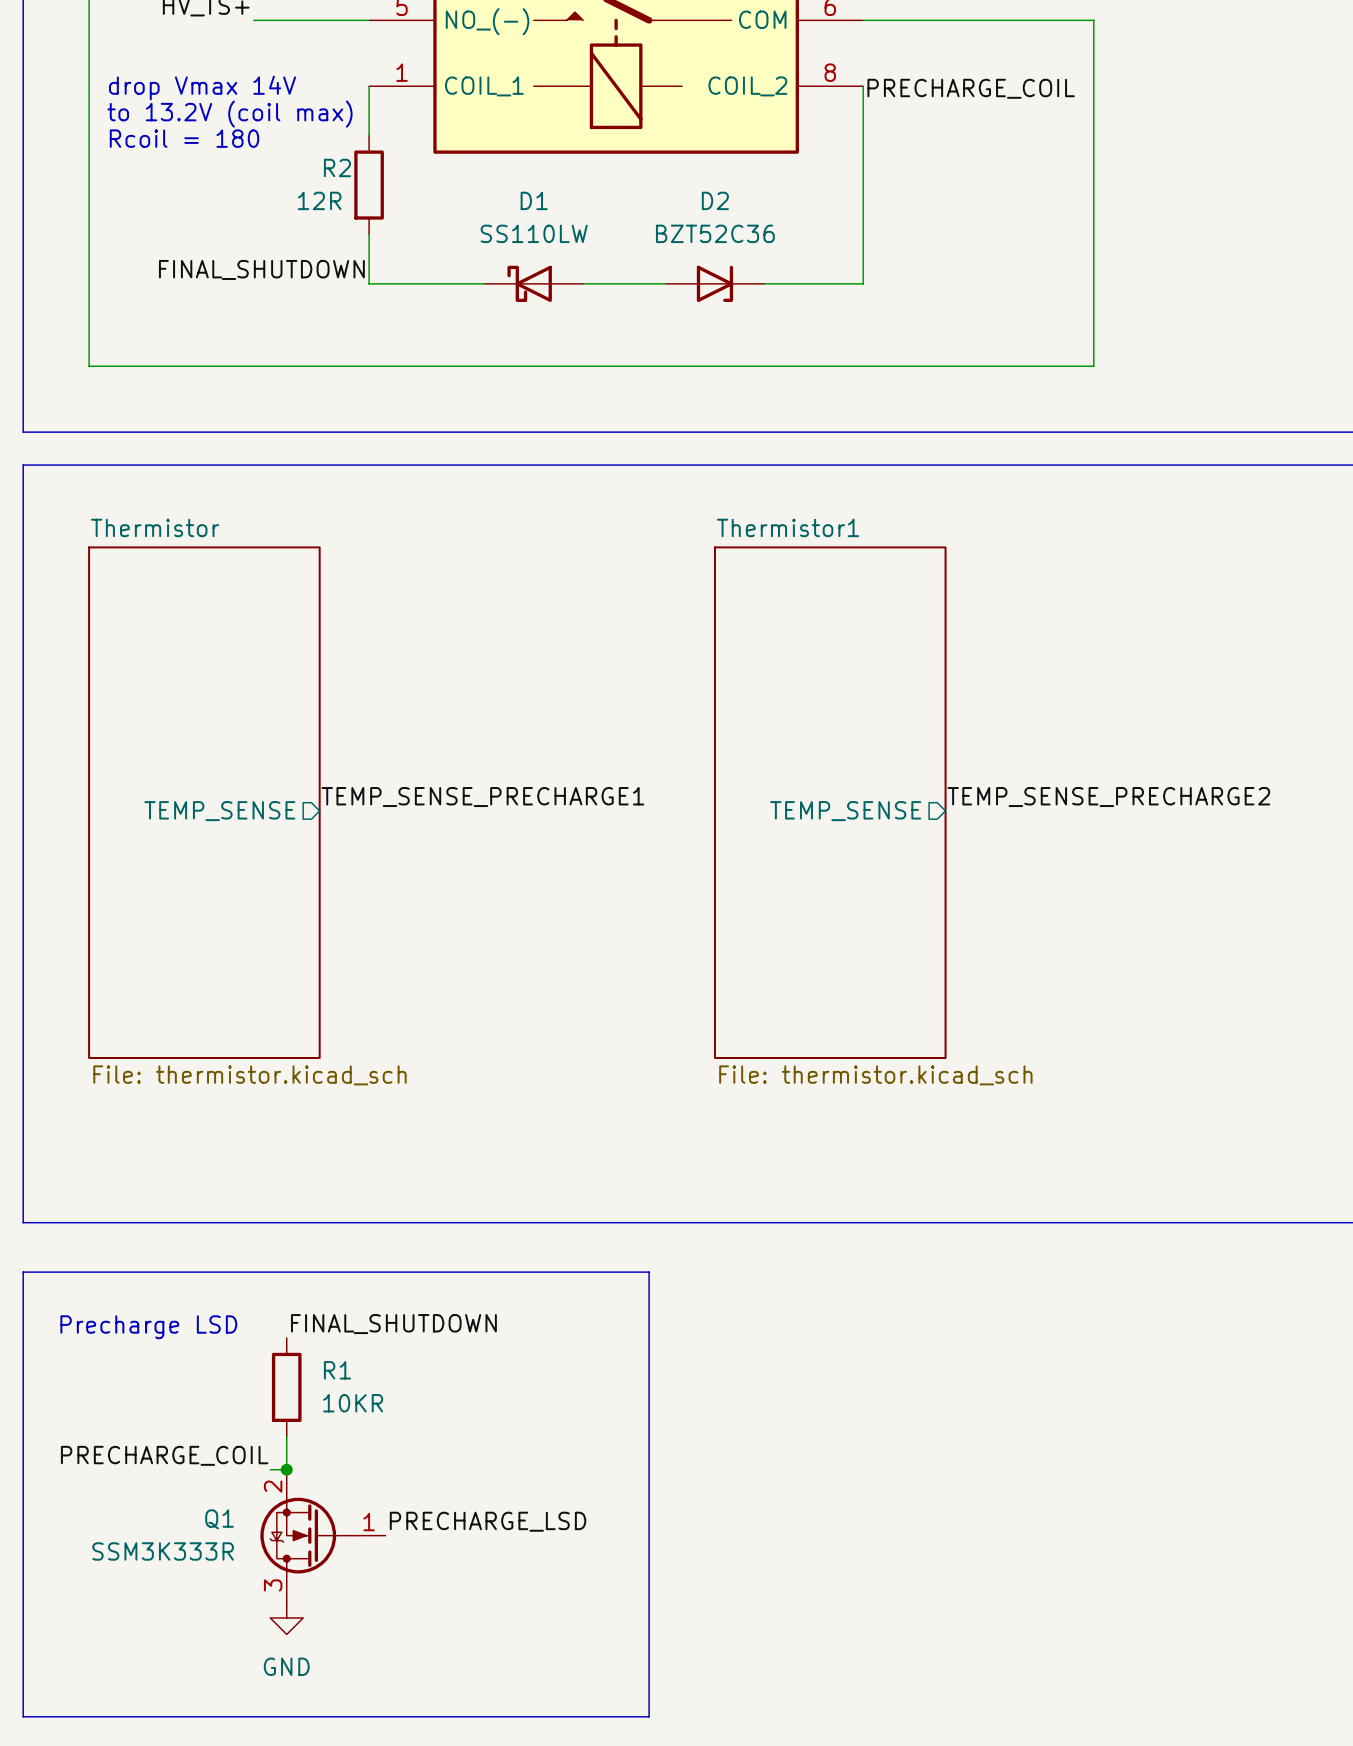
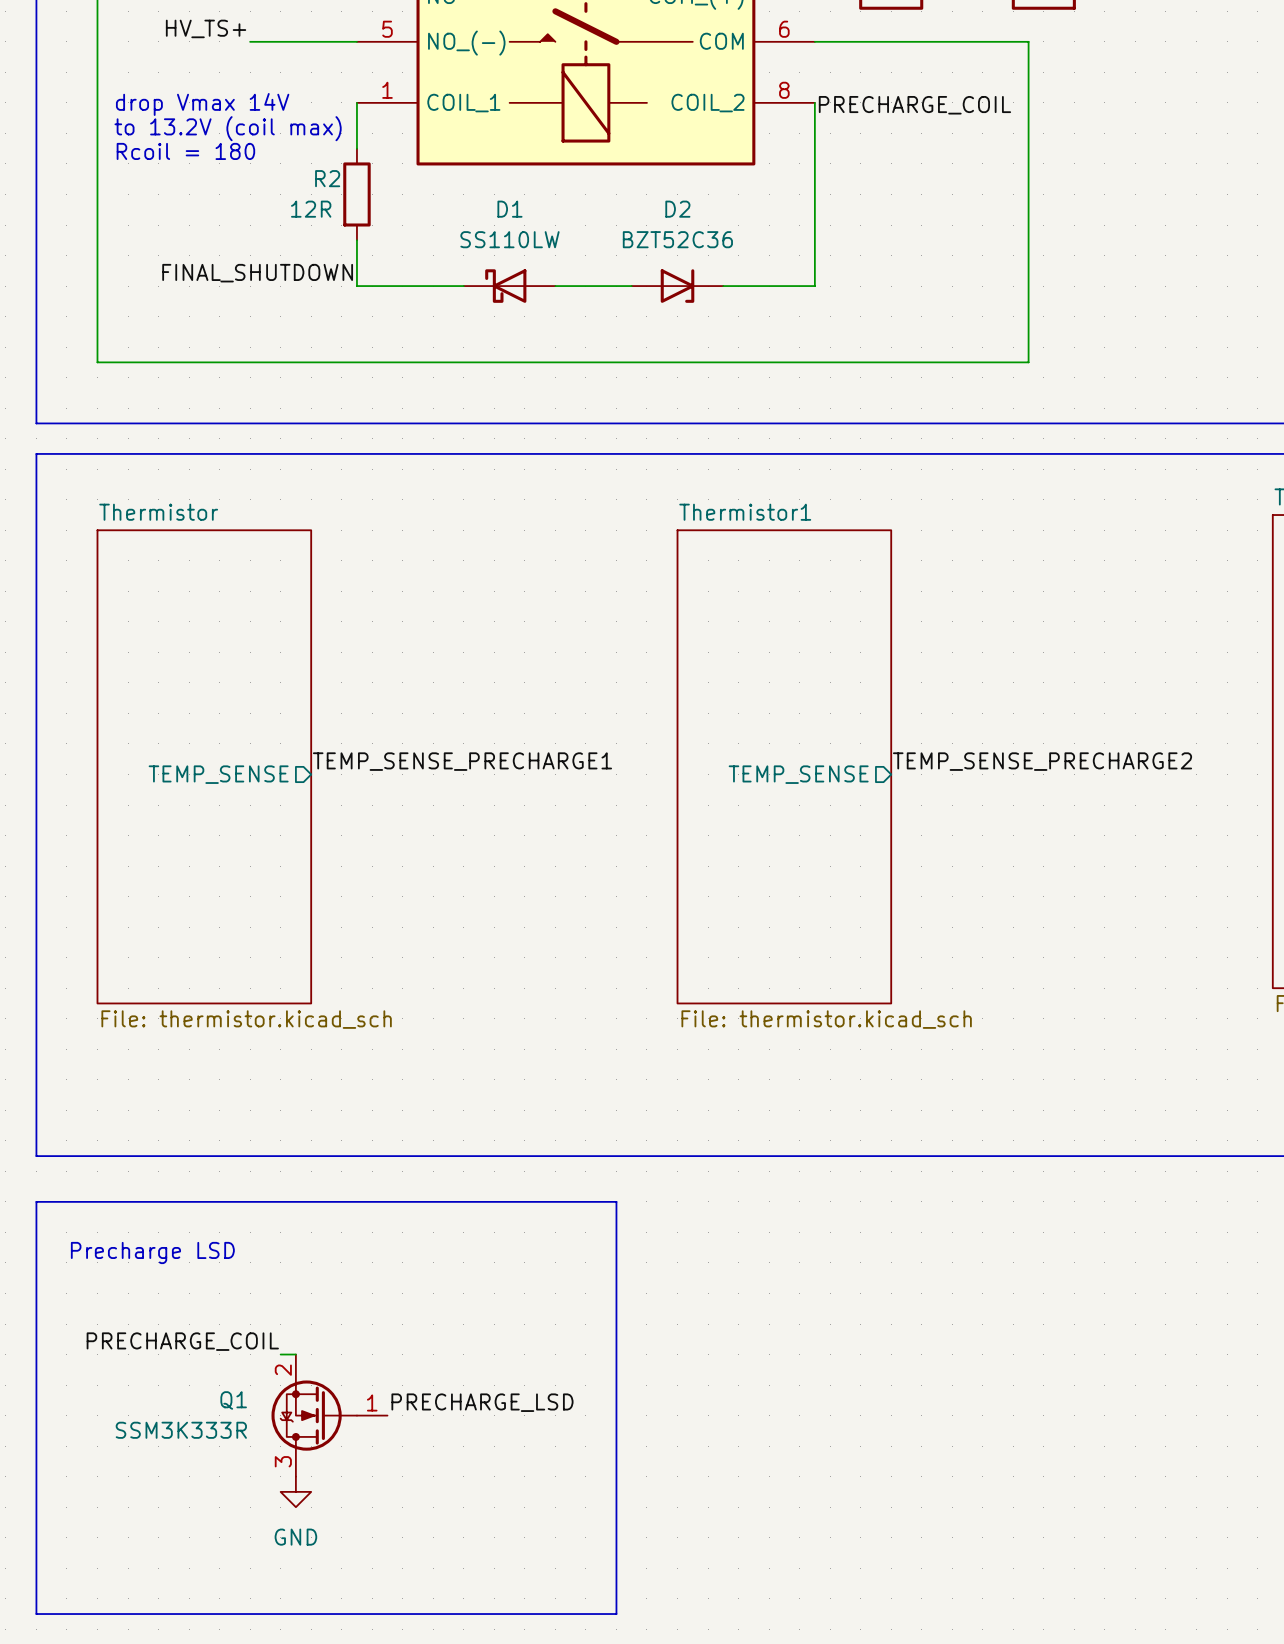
label: FINAL_SHUTDOWN (393, 1324) -> none
R1: 10KR (286, 1387) -> none
wire: (286, 1436) (286, 1469) (270, 1469) -> (280, 1354) (295, 1354)
label position: PRECHARGE_COIL (164, 1455) -> PRECHARGE_COIL (182, 1341)
junction: (286, 1469) -> none
label position: PRECHARGE_LSD (488, 1521) -> PRECHARGE_LSD (482, 1402)
Q1 position: (322, 1535) -> (329, 1415)
power symbol position: GND (286, 1617) -> GND (295, 1491)

